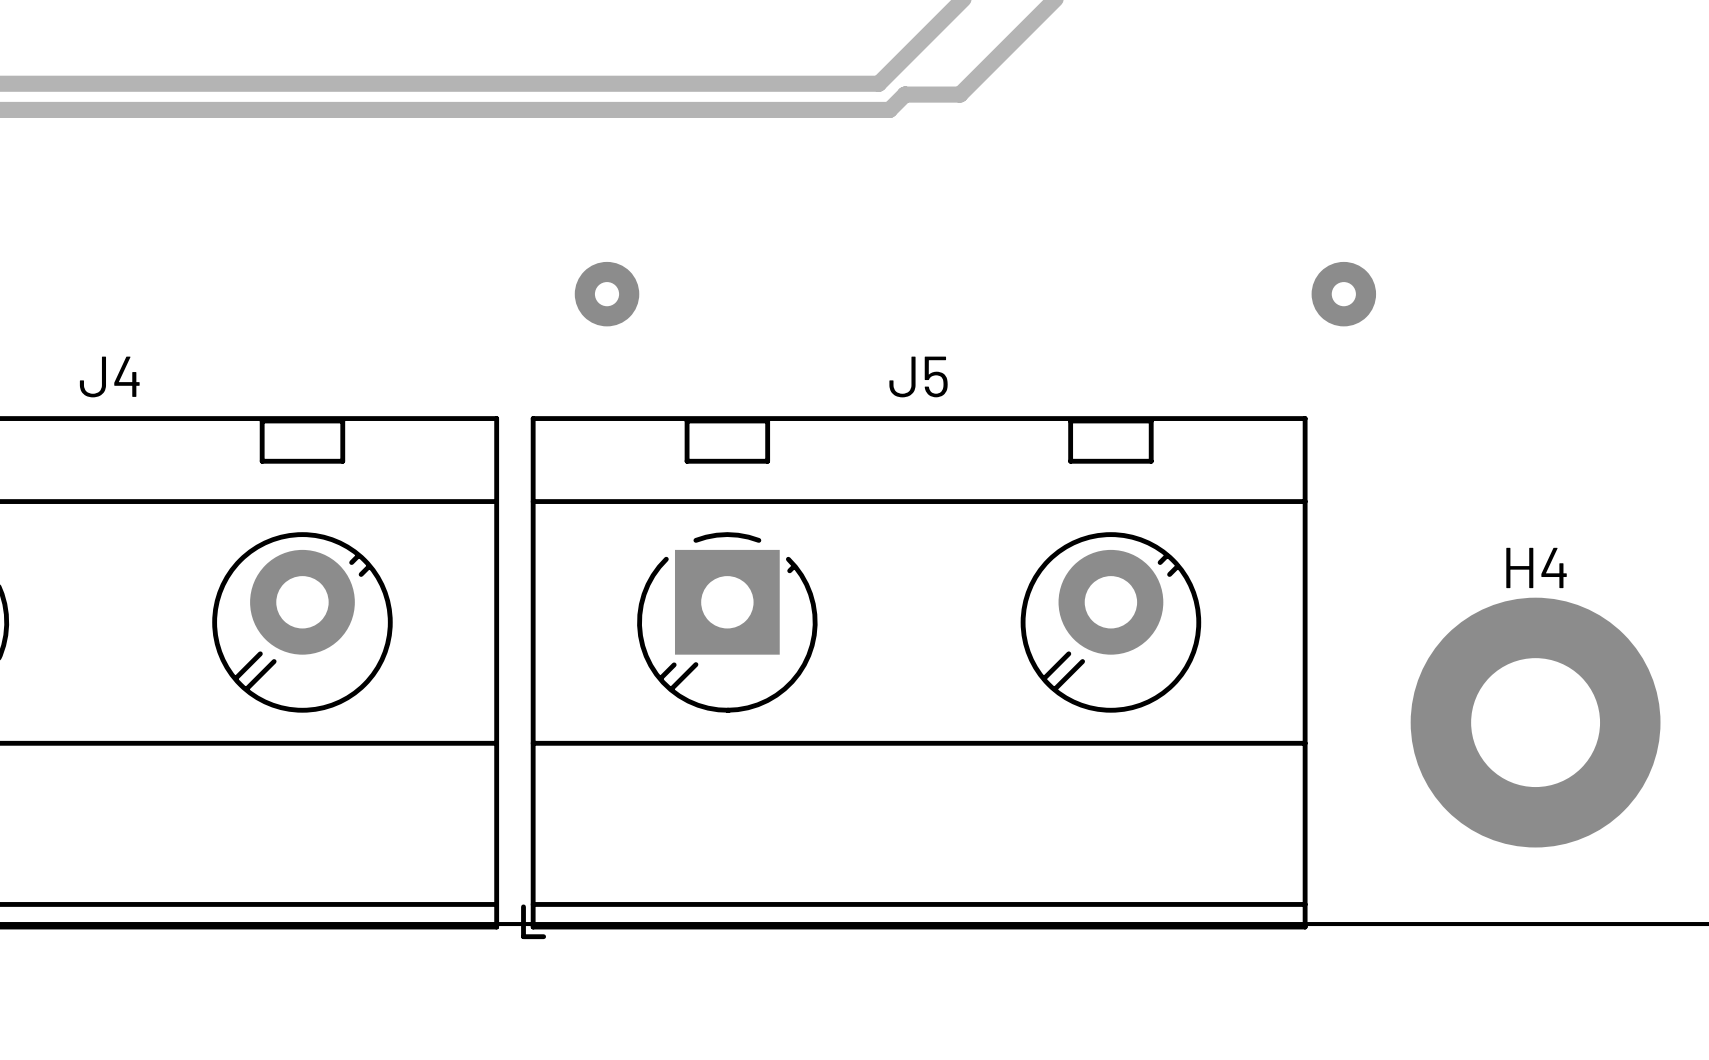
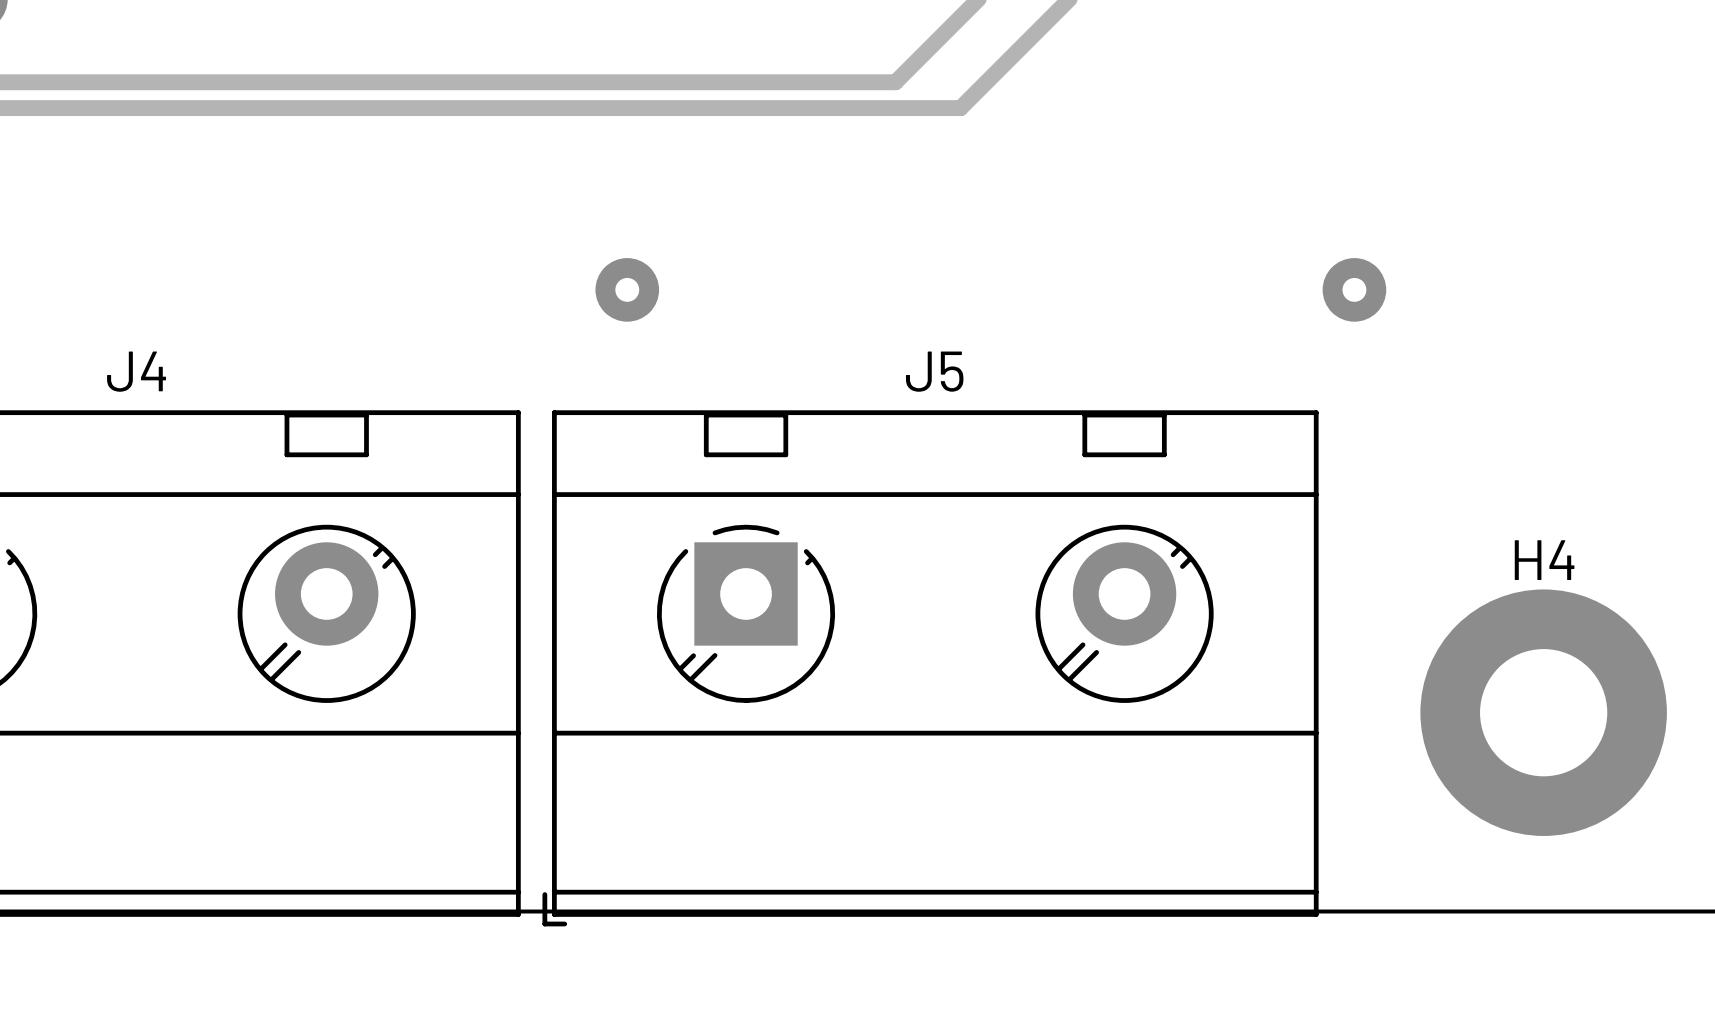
track: (960, 94) (905, 94) (889, 109) -> (975, 92) (960, 108) (906, 108)

